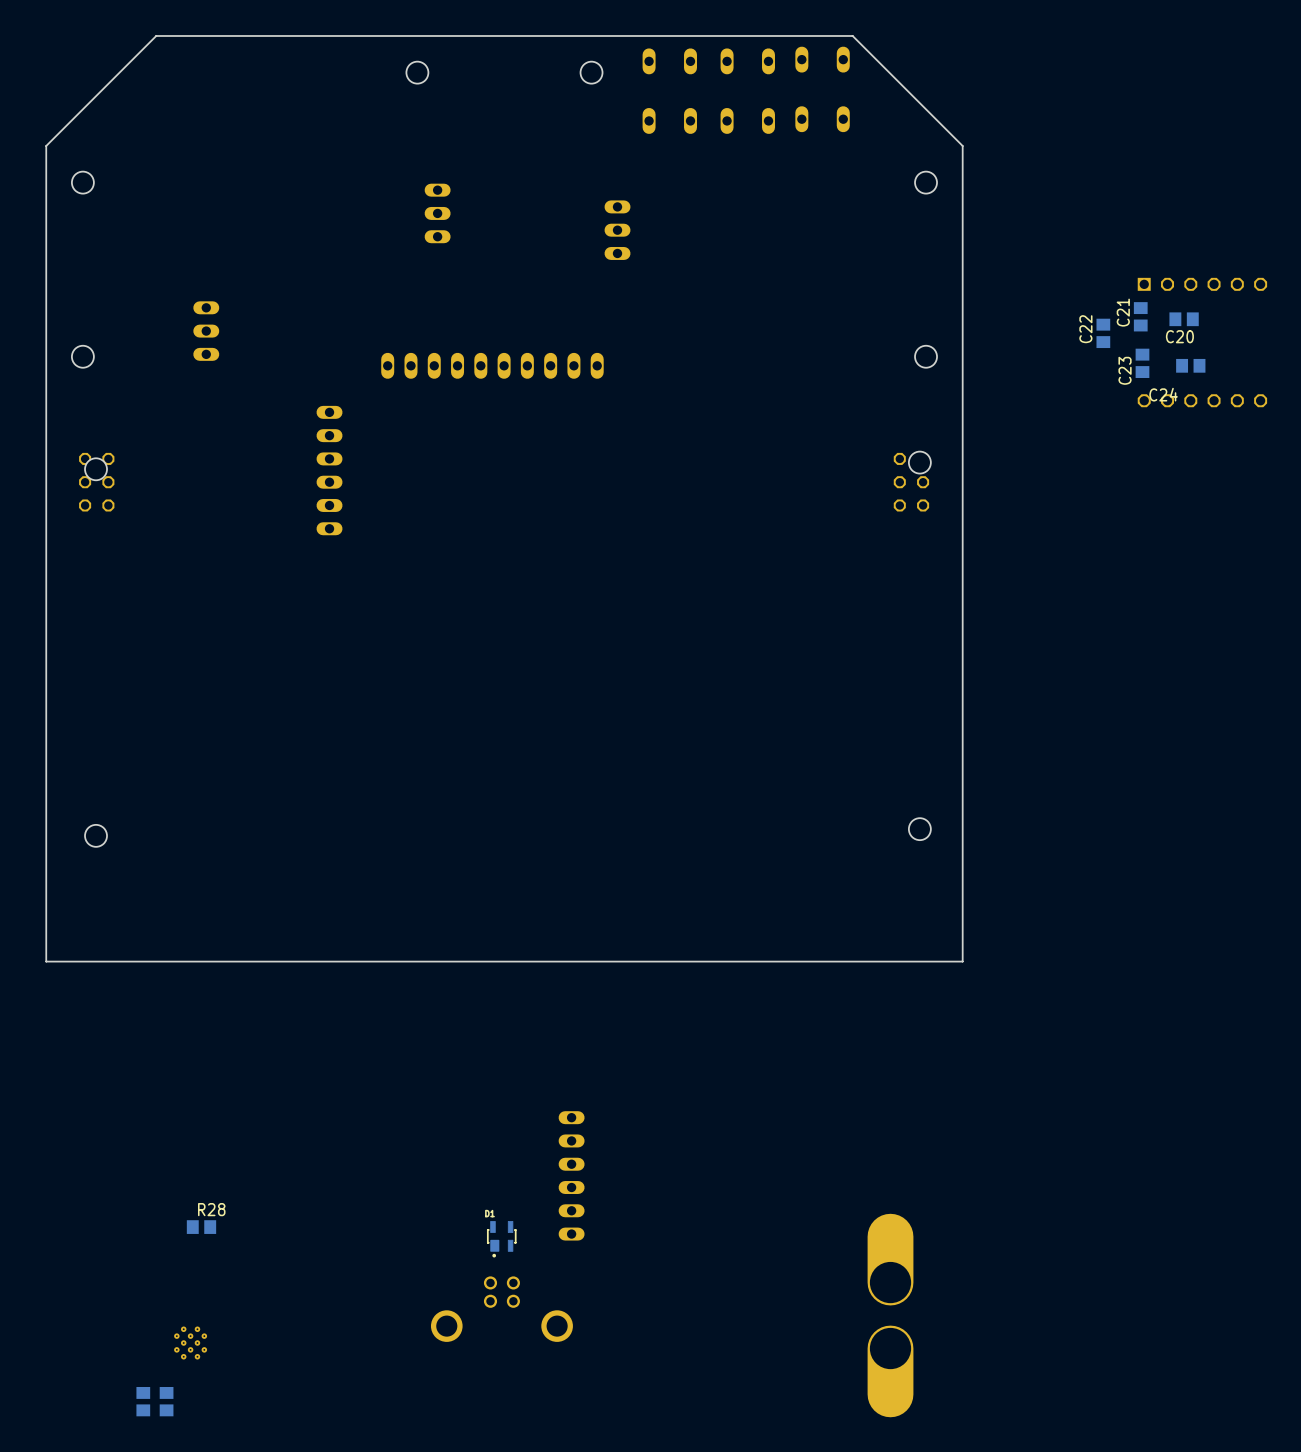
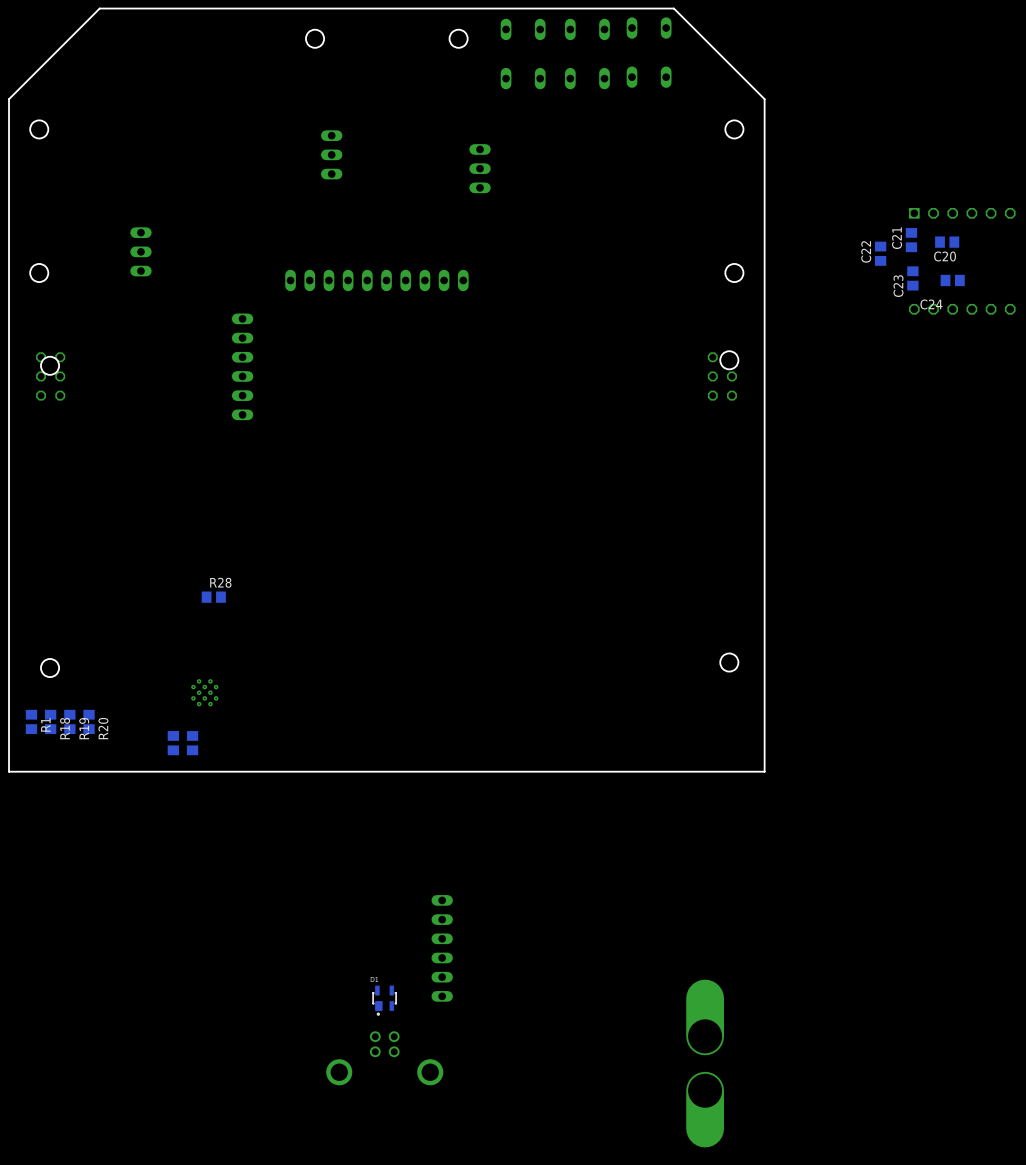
part: none -> (204, 692)
R1: none -> (31, 721)
R18: none -> (50, 721)
R19: none -> (69, 721)
R20: none -> (89, 721)
part: none -> (173, 743)
part: none -> (192, 743)
R28 position: (201, 1227) -> (213, 597)
part: (190, 1343) -> none
part: (143, 1401) -> none
part: (166, 1401) -> none

